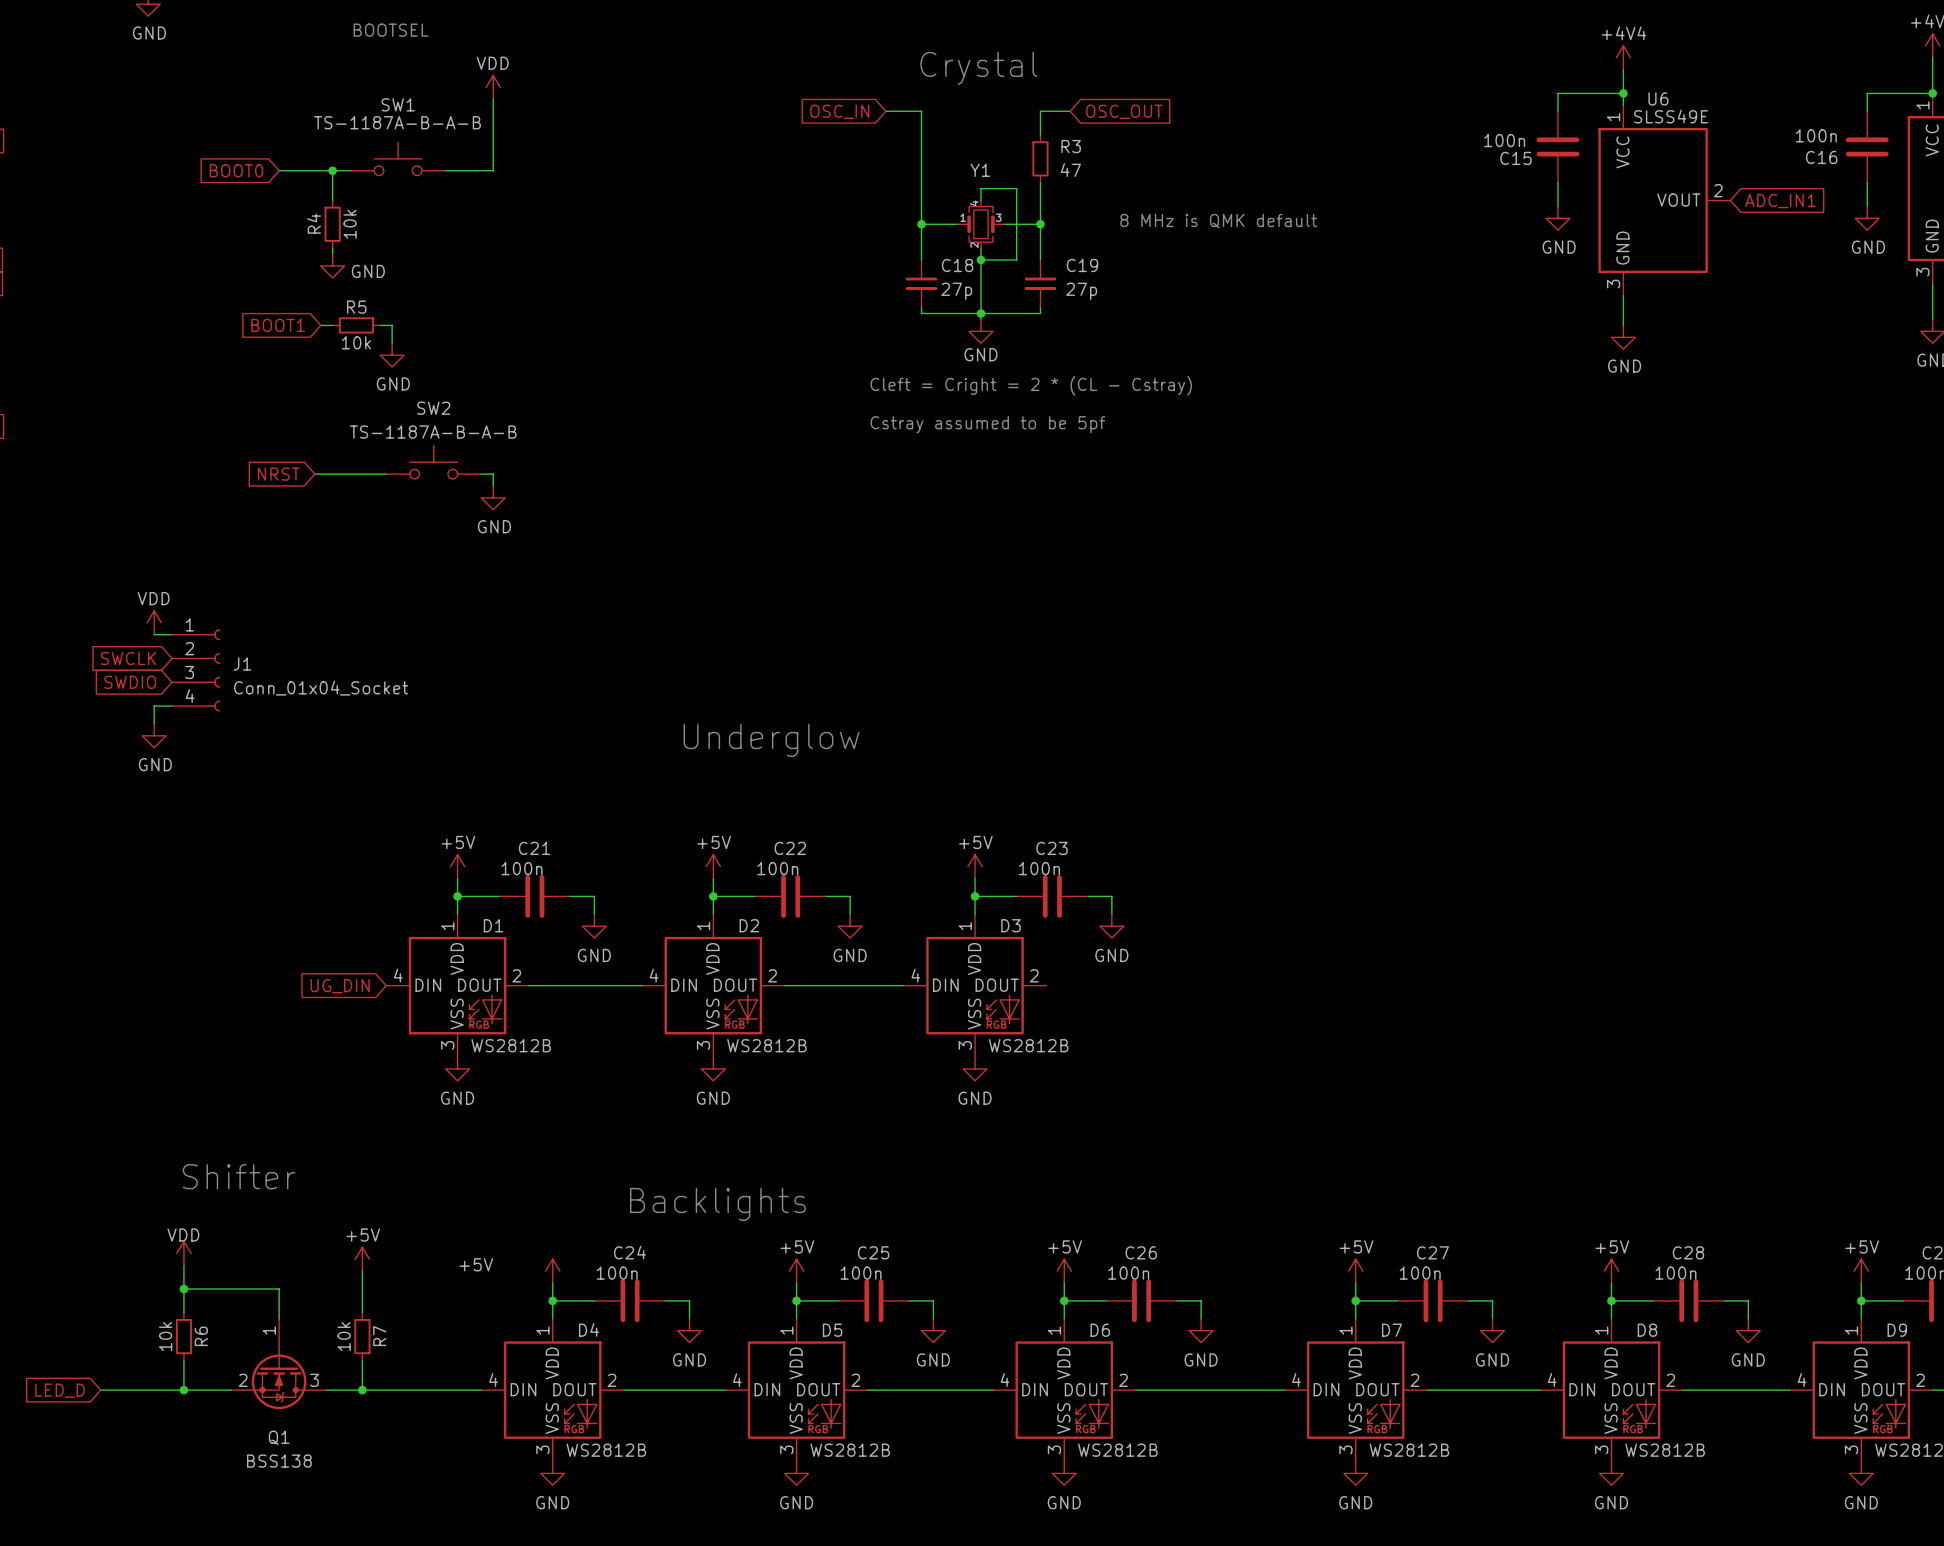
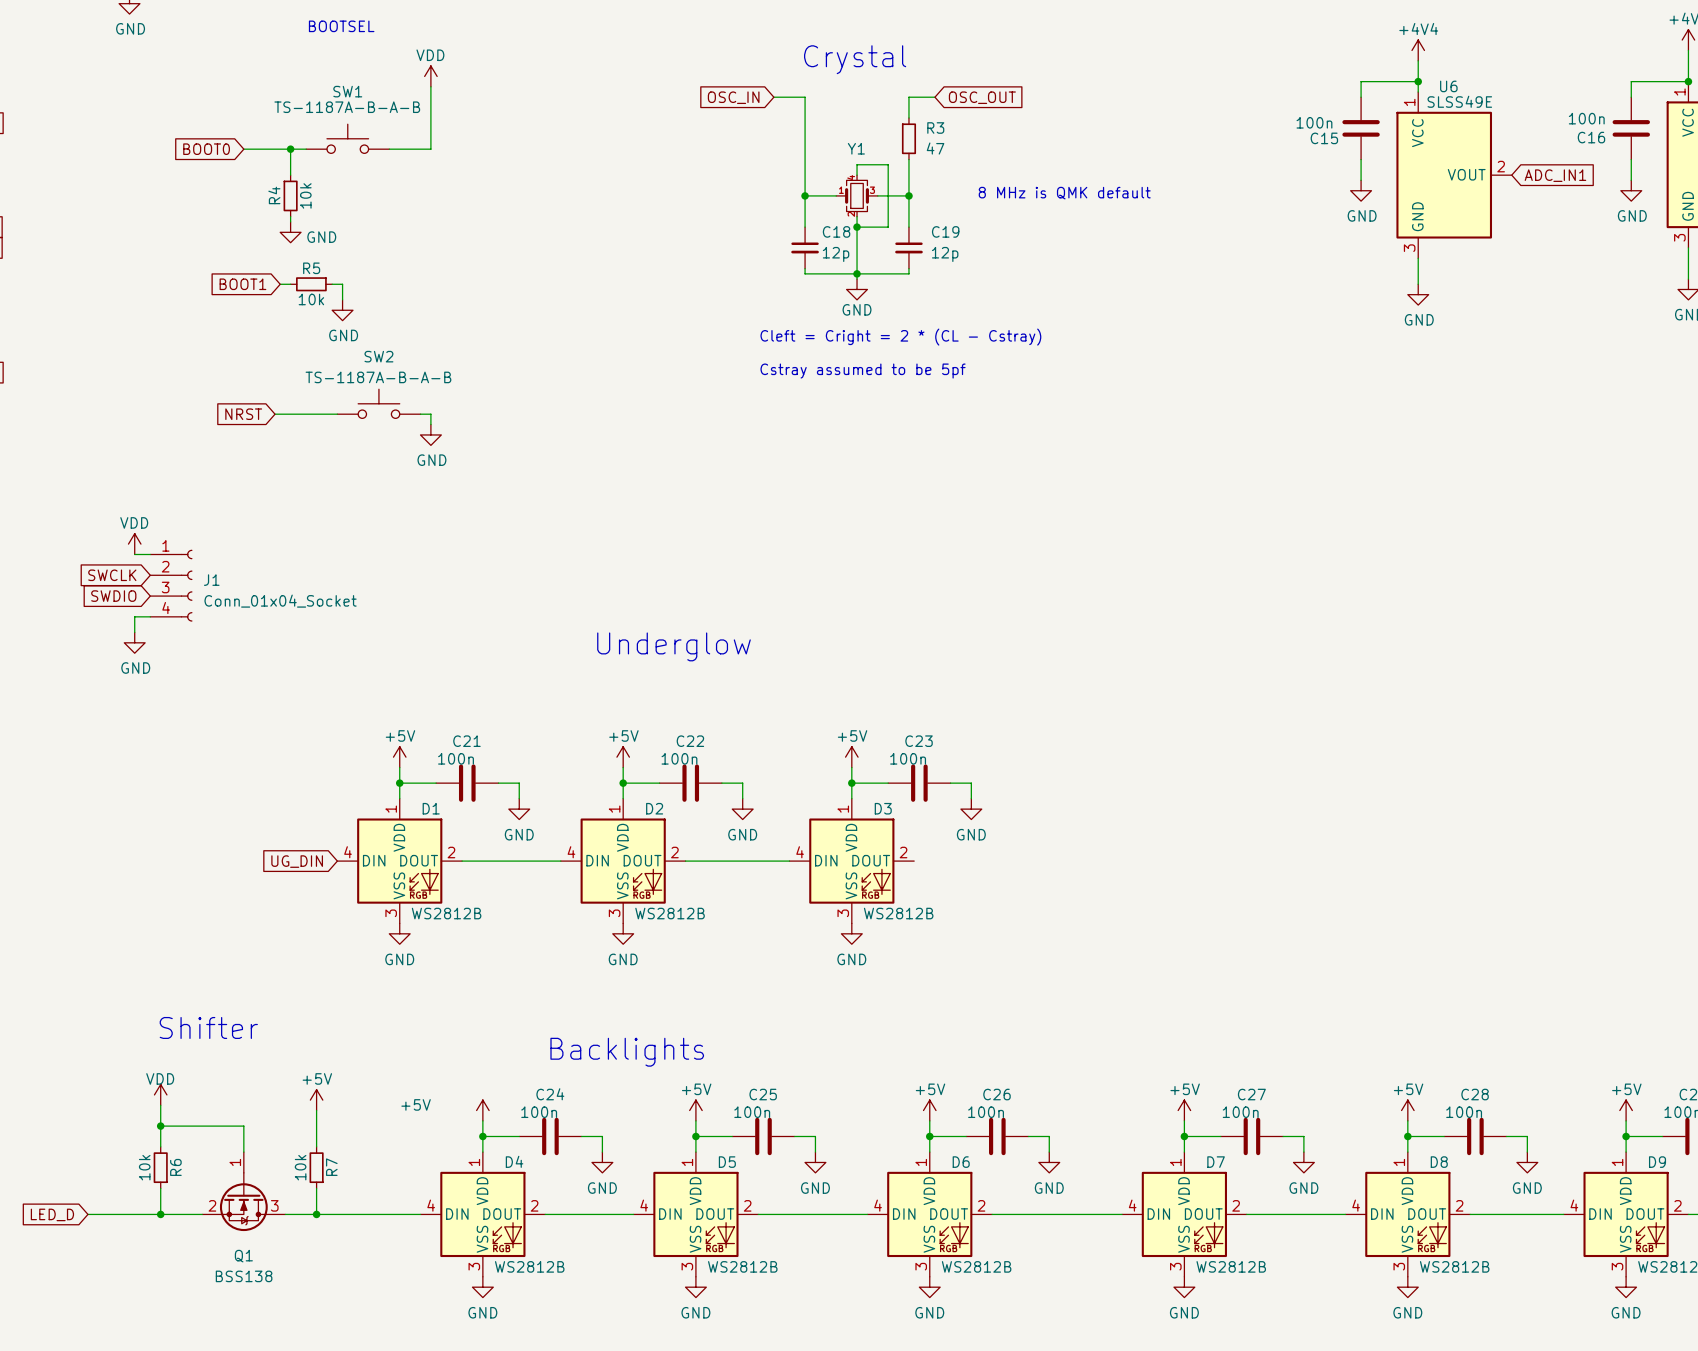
C18 value: 27p (956, 291) -> 12p (836, 254)
C19 value: 27p (1081, 291) -> 12p (945, 254)

